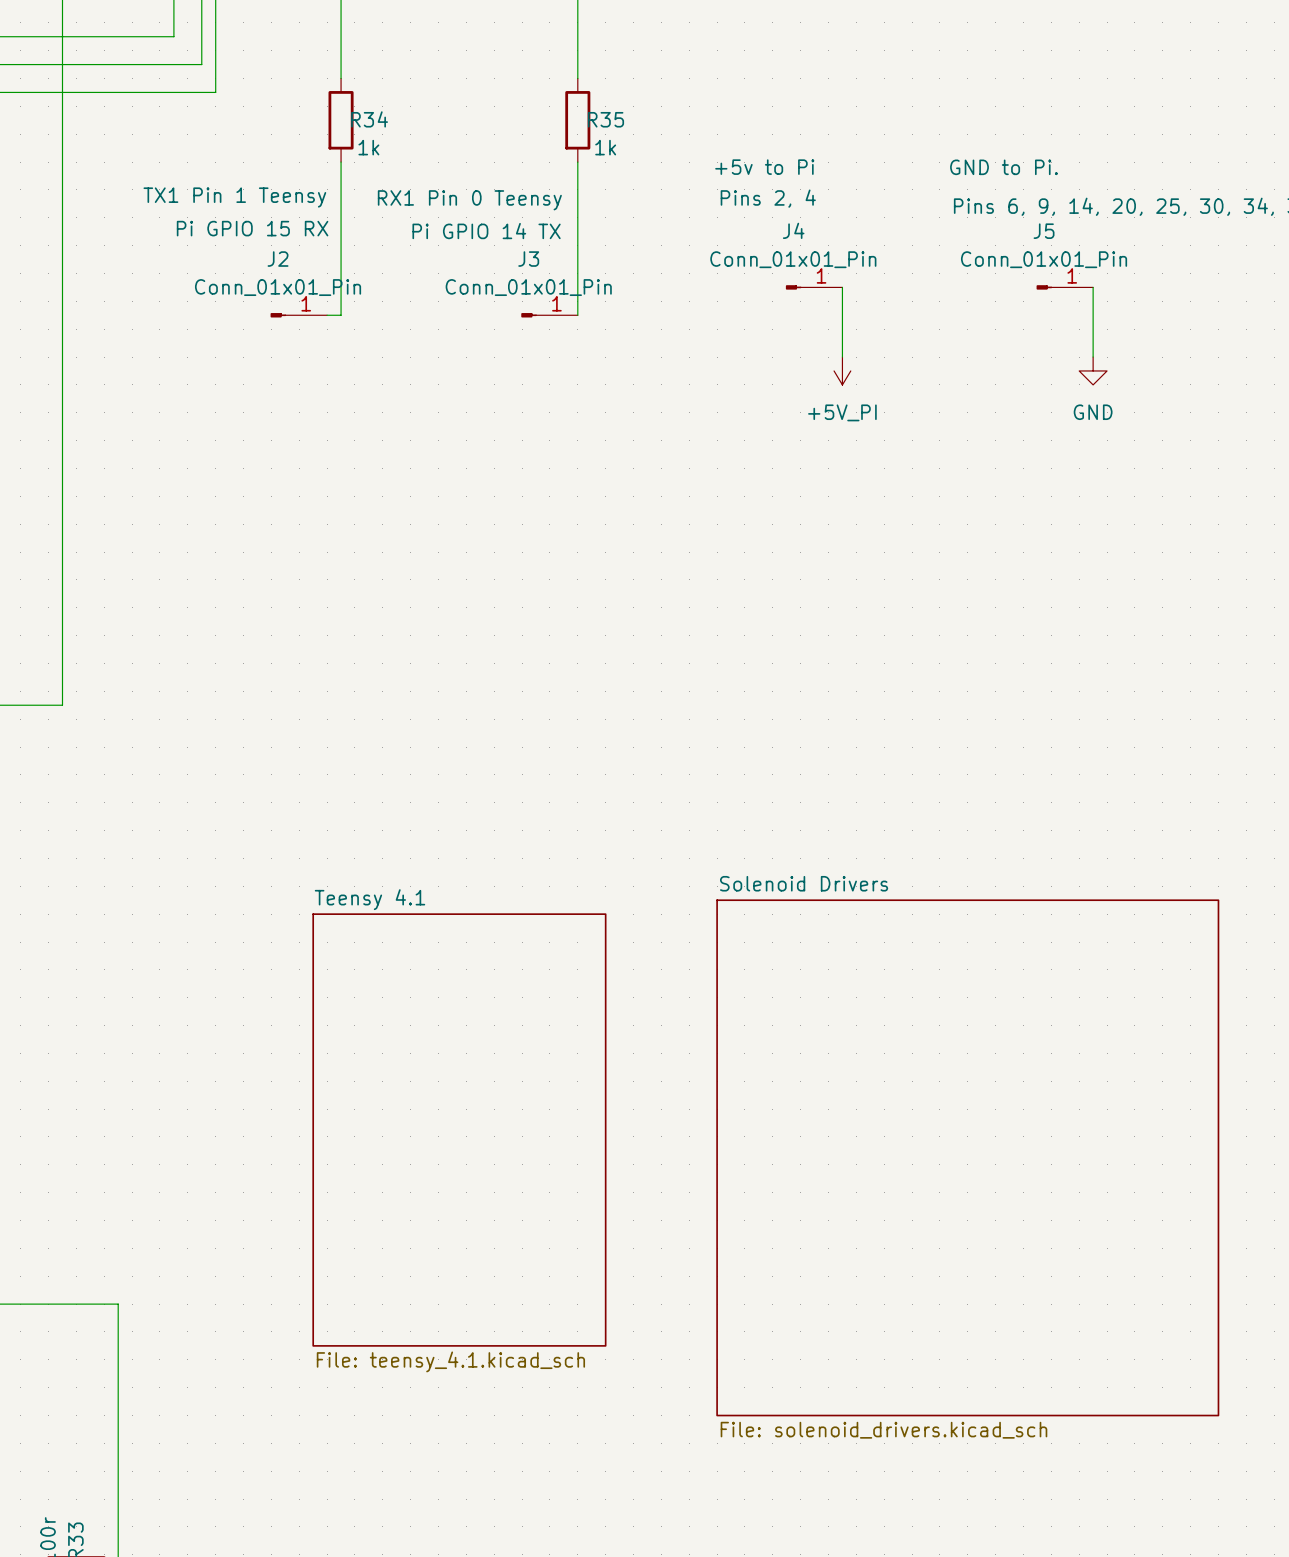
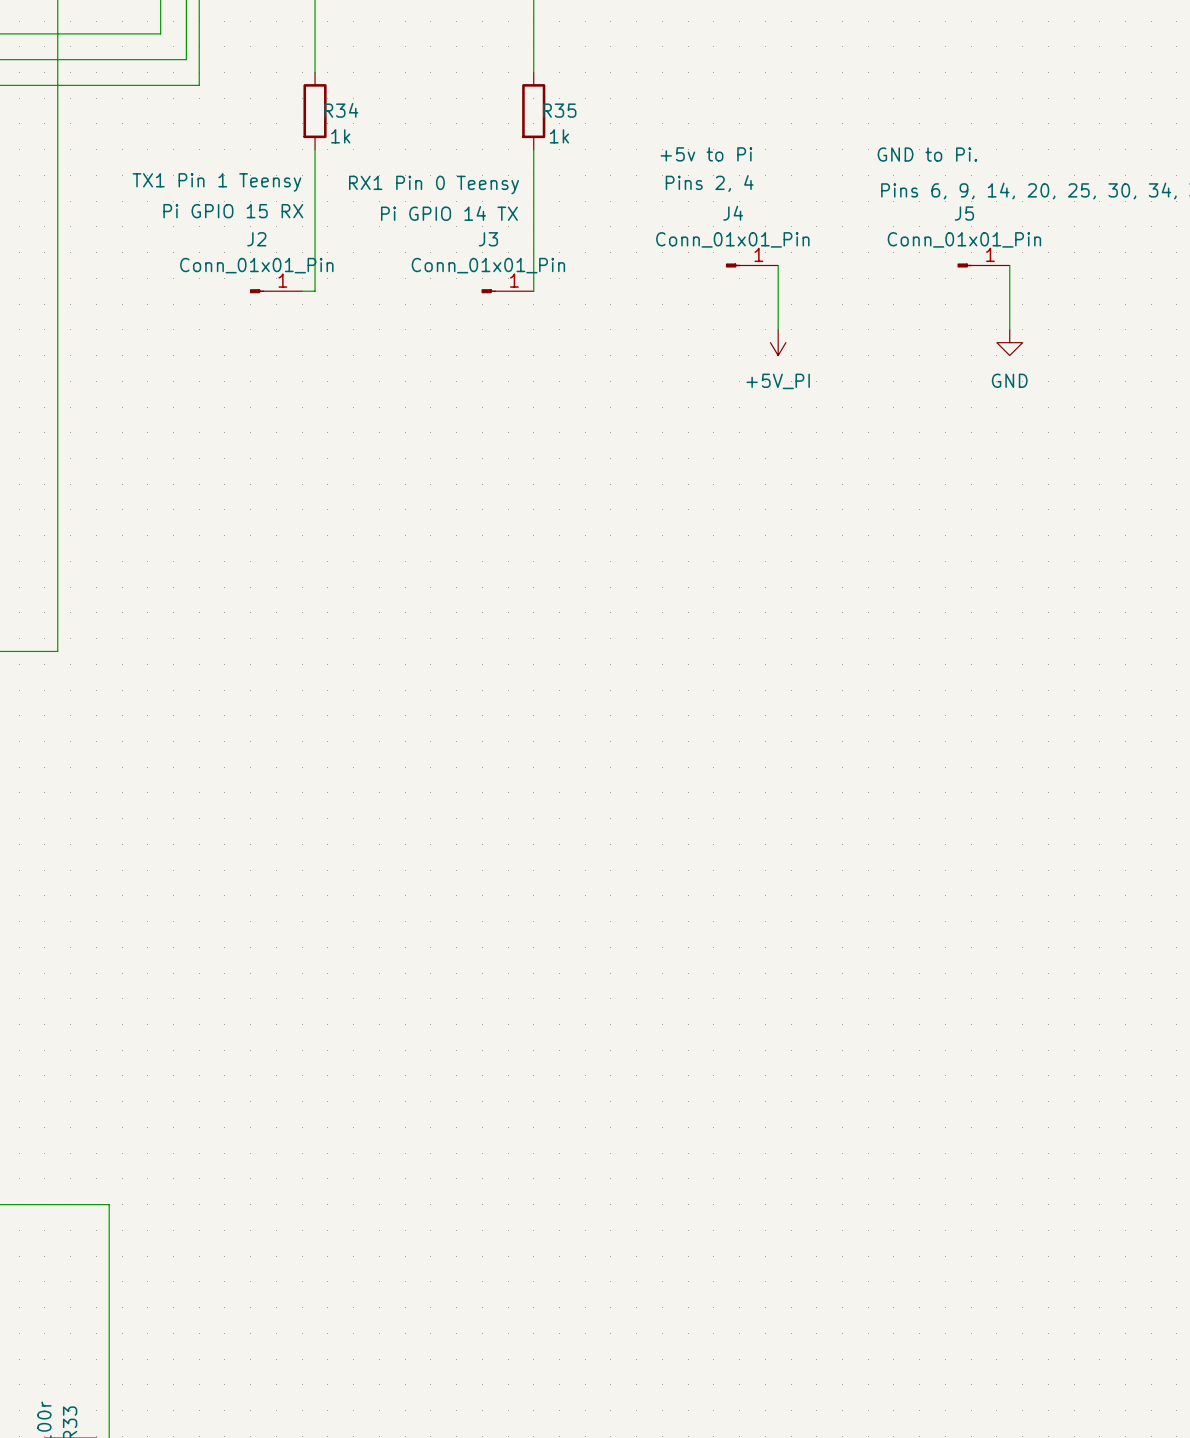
sheet Teensy 4.1: File: teensy_4.1.kicad_sch (459, 1130) -> none
sheet Solenoid Drivers: File: solenoid_drivers.kicad_sch (967, 1157) -> none

